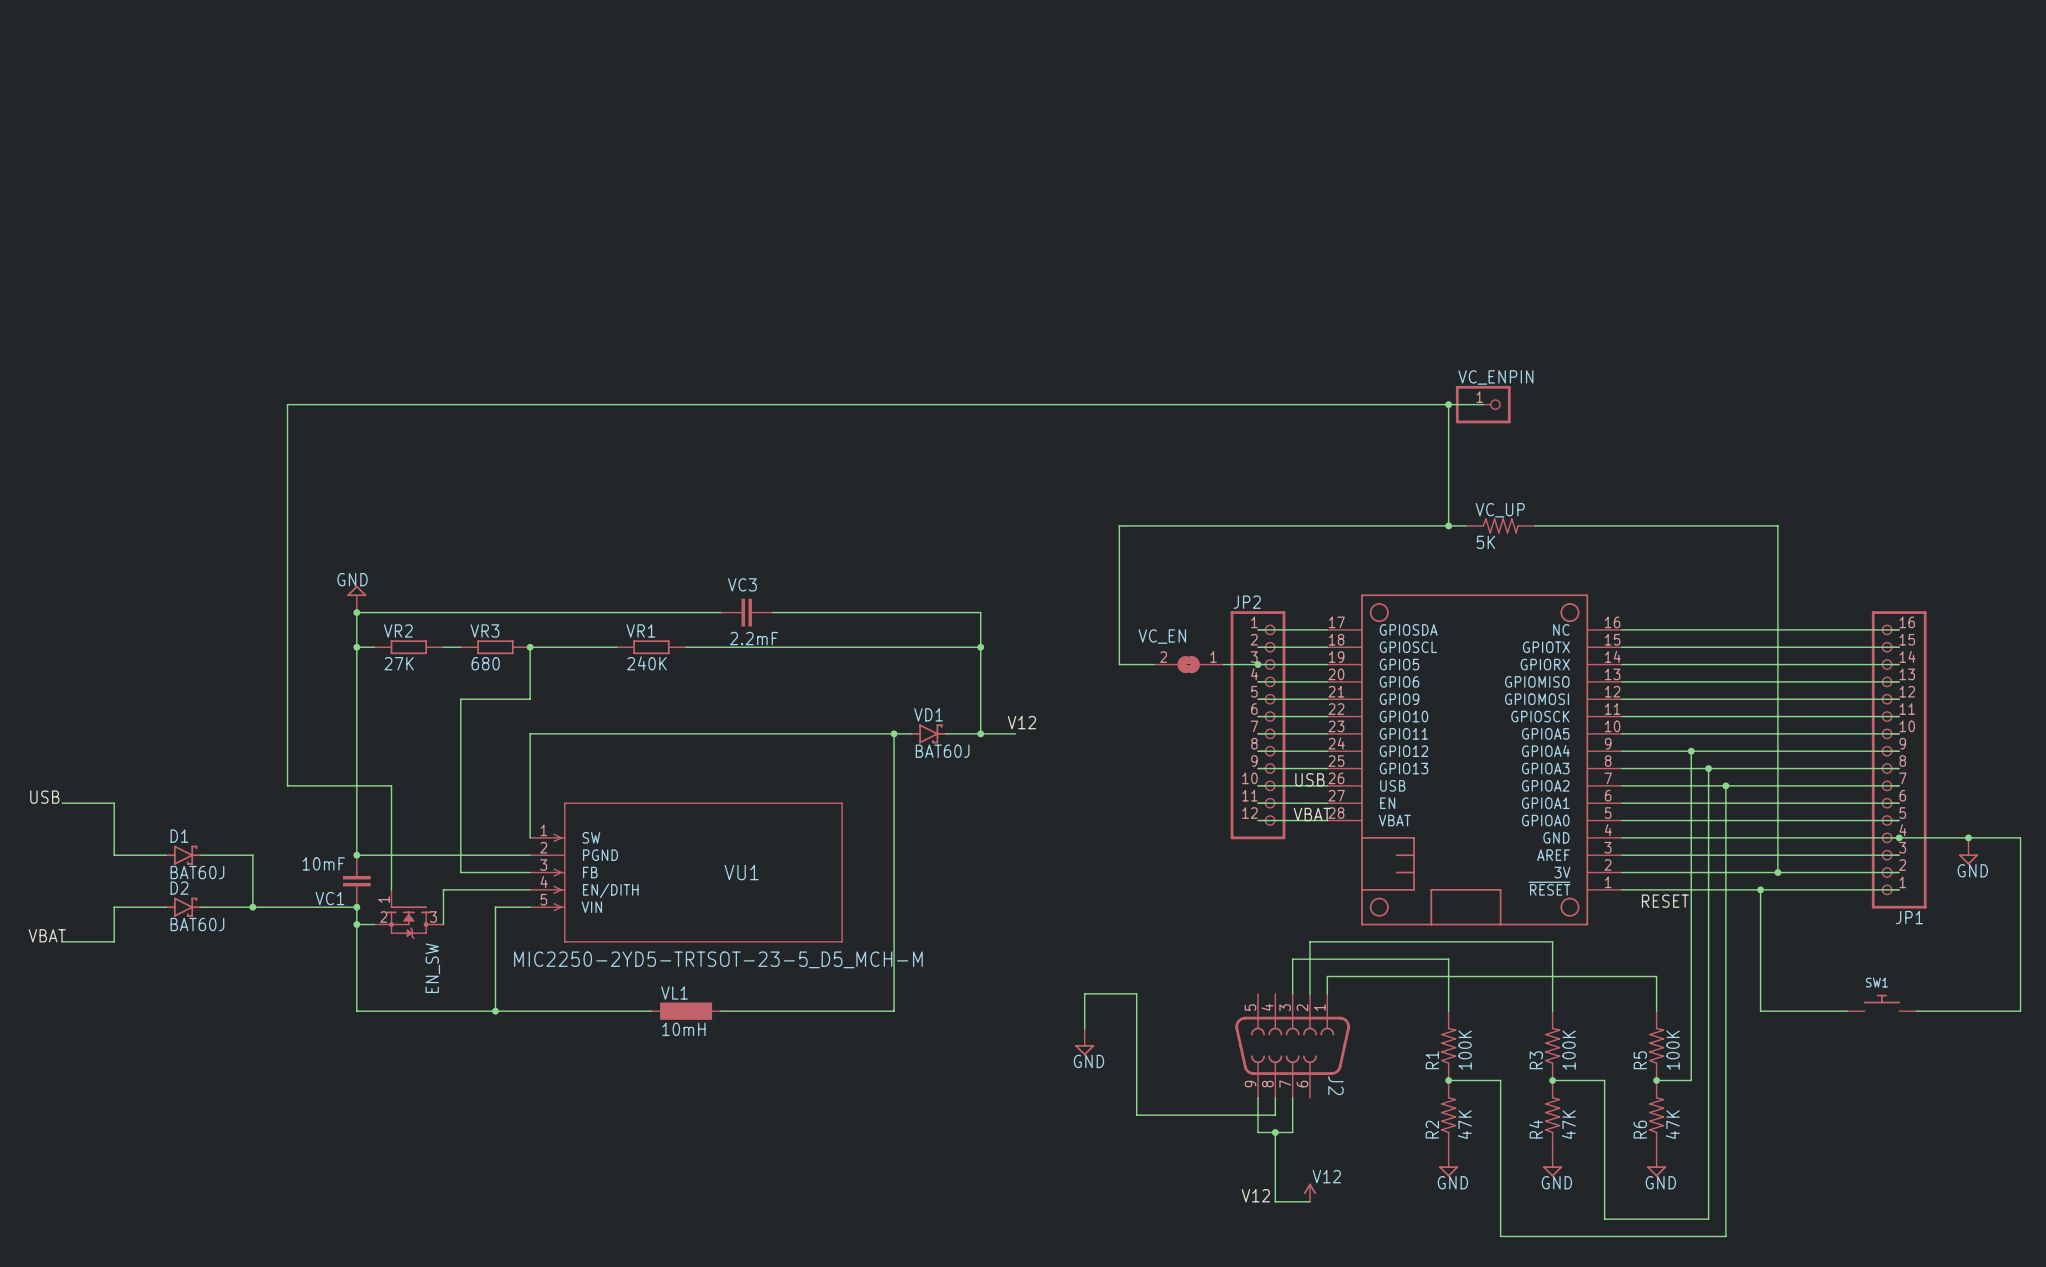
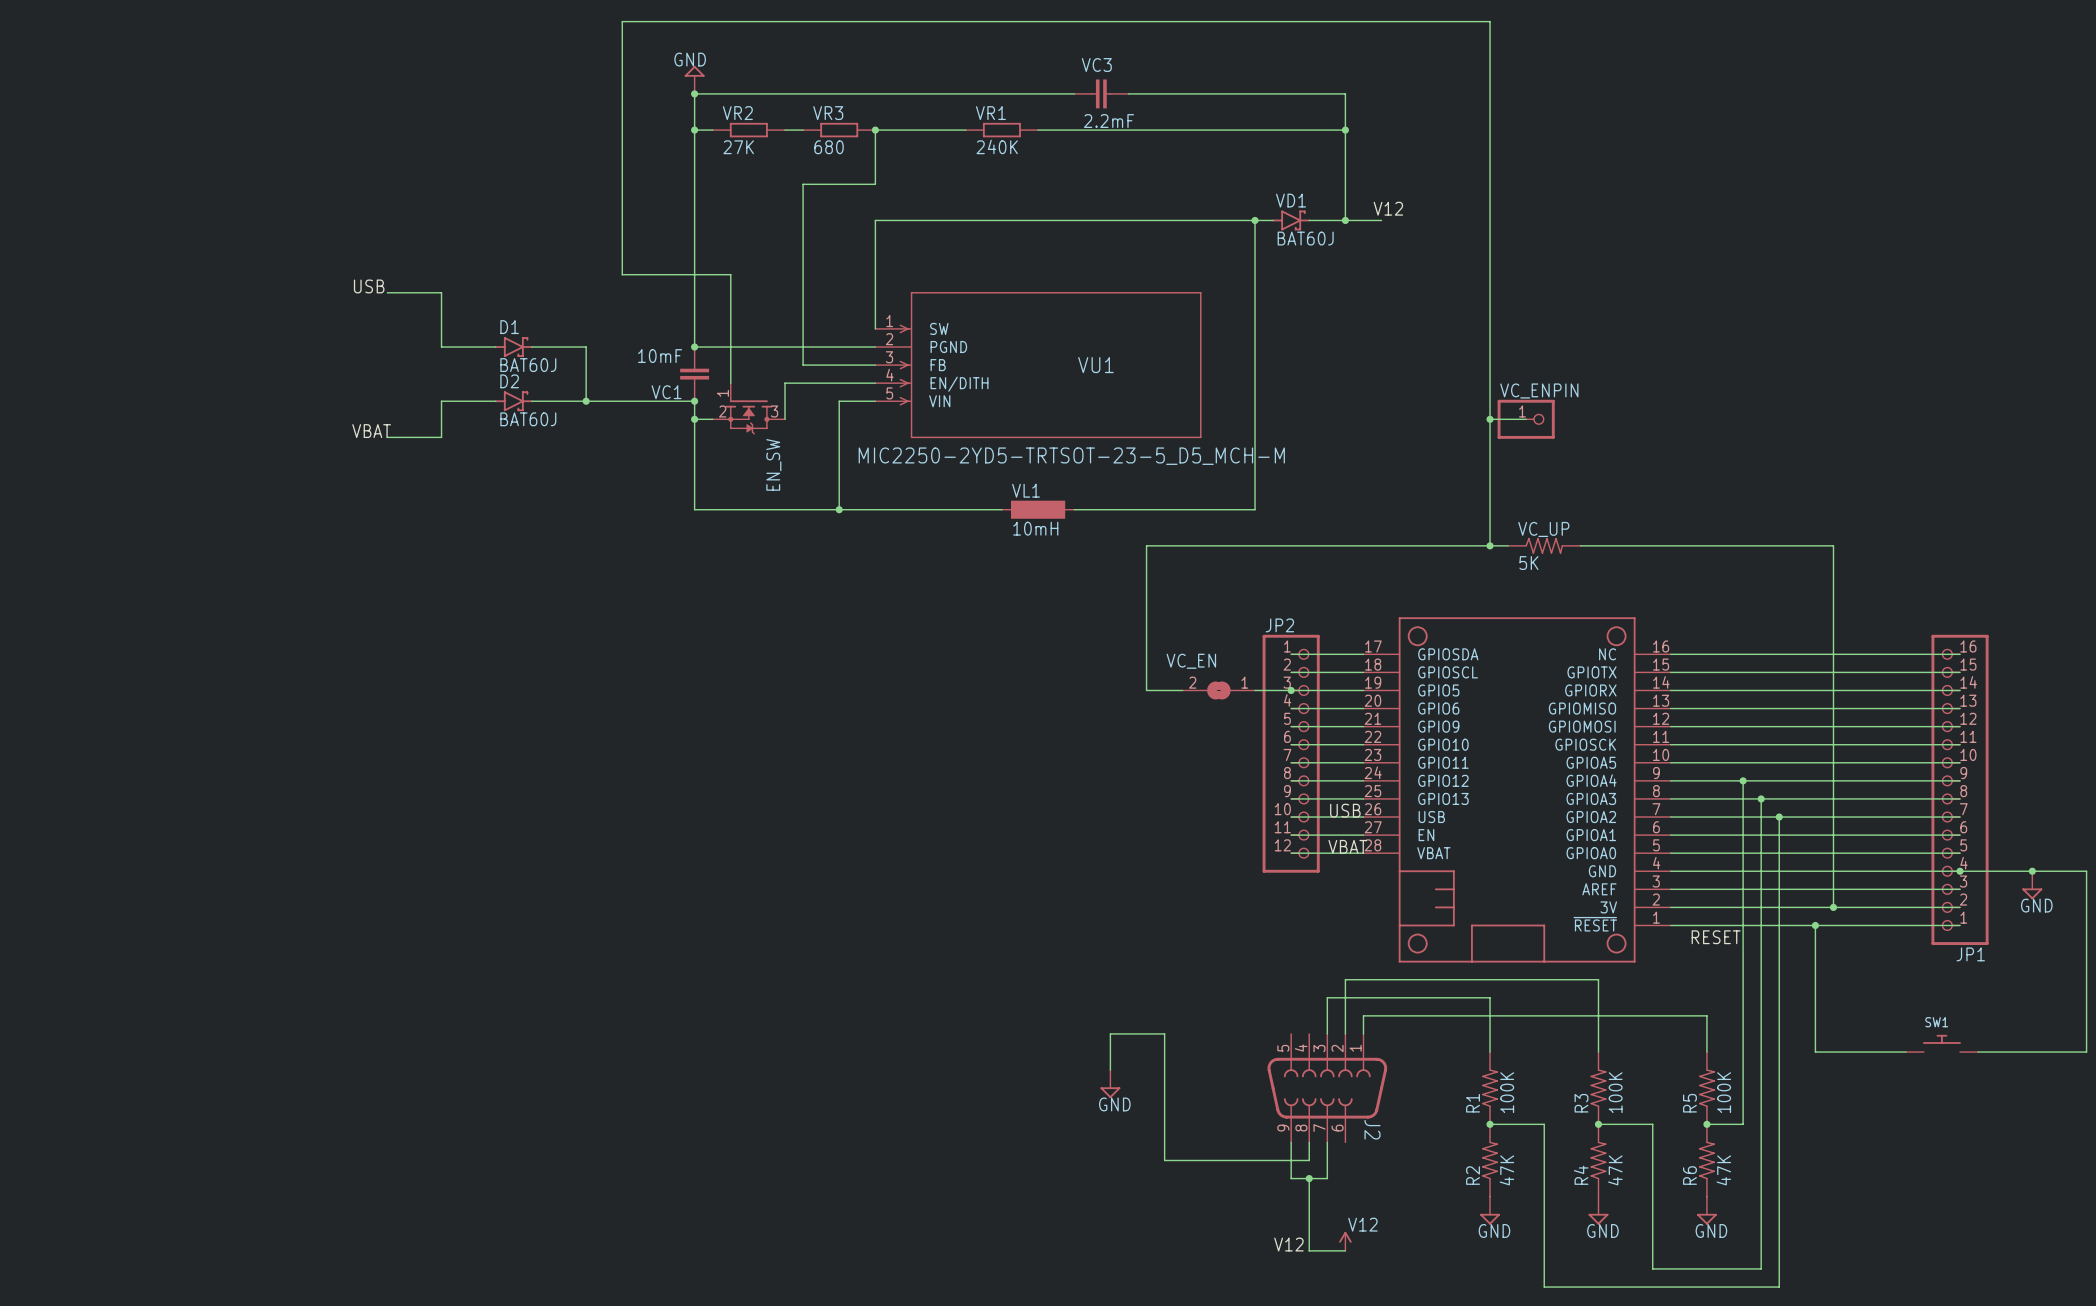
power symbol: none -> GND (694, 79)
junction: none -> (694, 93)
wire: none -> (1074, 93) (694, 93) (694, 347) (875, 347)
wire: none -> (1128, 93) (1345, 93) (1345, 220)
wire: none -> (694, 130) (712, 130)
junction: none -> (694, 130)
wire: none -> (785, 130) (803, 130)
junction: none -> (875, 130)
wire: none -> (965, 130) (875, 130) (875, 184) (803, 184) (803, 365) (875, 365)
wire: none -> (1038, 130) (1345, 130)
junction: none -> (1345, 130)
label: none -> V12 (1388, 208)
wire: none -> (1255, 220) (1255, 509) (1074, 509)
junction: none -> (1255, 220)
wire: none -> (1273, 220) (875, 220) (875, 328)
wire: none -> (1309, 220) (1381, 220)
junction: none -> (1345, 220)
label: none -> USB (369, 286)
wire: none -> (387, 292) (441, 292) (441, 347) (495, 347)
wire: none -> (531, 347) (586, 347) (586, 401)
junction: none -> (694, 347)
wire: none -> (875, 383) (785, 383) (785, 419)
wire: none -> (495, 401) (441, 401) (441, 437) (387, 437)
wire: none -> (531, 401) (694, 401) (694, 509) (1001, 509)
junction: none -> (586, 401)
junction: none -> (694, 401)
wire: none -> (875, 401) (839, 401) (839, 509)
EN_SW: none -> (748, 408)
wire: (686, 404) (287, 404) (287, 785) (391, 785) (391, 889) -> none
junction: none -> (694, 419)
wire: (703, 404) (1448, 404) -> (730, 383) (730, 274) (622, 274) (622, 21) (1490, 21) (1490, 419)
label: none -> VBAT (371, 431)
junction: none -> (839, 509)
power symbol: GND (356, 599) -> none
junction: (356, 612) -> none
wire: (720, 612) (356, 612) (356, 855) (530, 855) -> none
VC3 position: (746, 612) -> (1101, 93)
wire: (772, 612) (980, 612) (980, 733) -> none
wire: (356, 647) (374, 647) -> none
junction: (356, 647) -> none
VR2 position: (408, 647) -> (748, 130)
wire: (443, 647) (460, 647) -> none
VR3 position: (495, 647) -> (839, 130)
junction: (530, 647) -> none
wire: (616, 647) (530, 647) (530, 699) (460, 699) (460, 872) (530, 872) -> none
VR1 position: (651, 647) -> (1001, 130)
wire: (686, 647) (980, 647) -> none
junction: (980, 647) -> none
label: V12 (1021, 722) -> none
wire: (894, 733) (894, 1011) (720, 1011) -> none
junction: (894, 733) -> none
wire: (911, 733) (530, 733) (530, 837) -> none
VD1 position: (928, 733) -> (1291, 220)
wire: (946, 733) (1015, 733) -> none
junction: (980, 733) -> none
label: USB (44, 797) -> none
wire: (62, 803) (114, 803) (114, 855) (166, 855) -> none
D1 position: (183, 855) -> (513, 347)
wire: (200, 855) (252, 855) (252, 907) -> none
junction: (356, 855) -> none
VU1 position: (686, 872) -> (1038, 365)
VC1 position: (356, 881) -> (694, 374)
wire: (530, 889) (443, 889) (443, 924) -> none
wire: (166, 907) (114, 907) (114, 941) (62, 941) -> none
D2 position: (183, 907) -> (513, 401)
wire: (200, 907) (356, 907) (356, 1011) (651, 1011) -> none
junction: (252, 907) -> none
junction: (356, 907) -> none
wire: (530, 907) (495, 907) (495, 1011) -> none
EN_SW: (408, 914) -> none
wire: (356, 924) (374, 924) -> none
junction: (356, 924) -> none
label: VBAT (47, 935) -> none
junction: (495, 1011) -> none
VL1 position: (686, 1011) -> (1038, 509)

